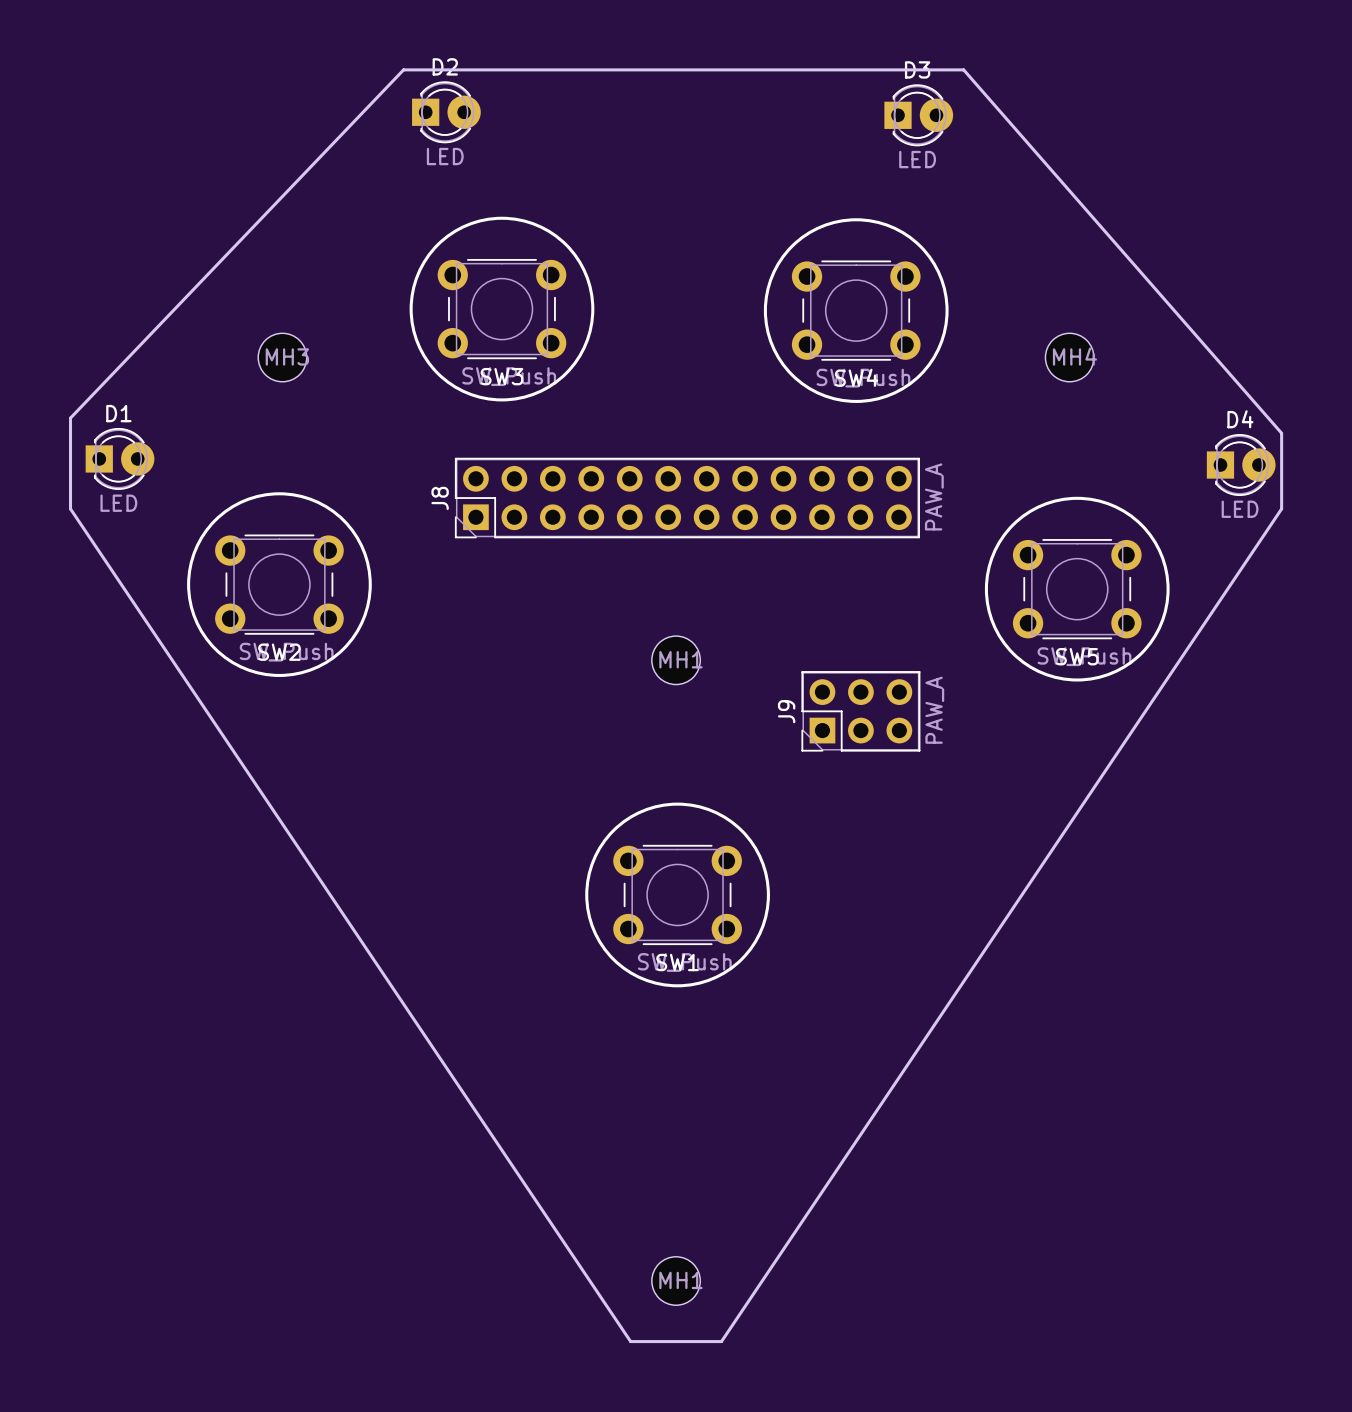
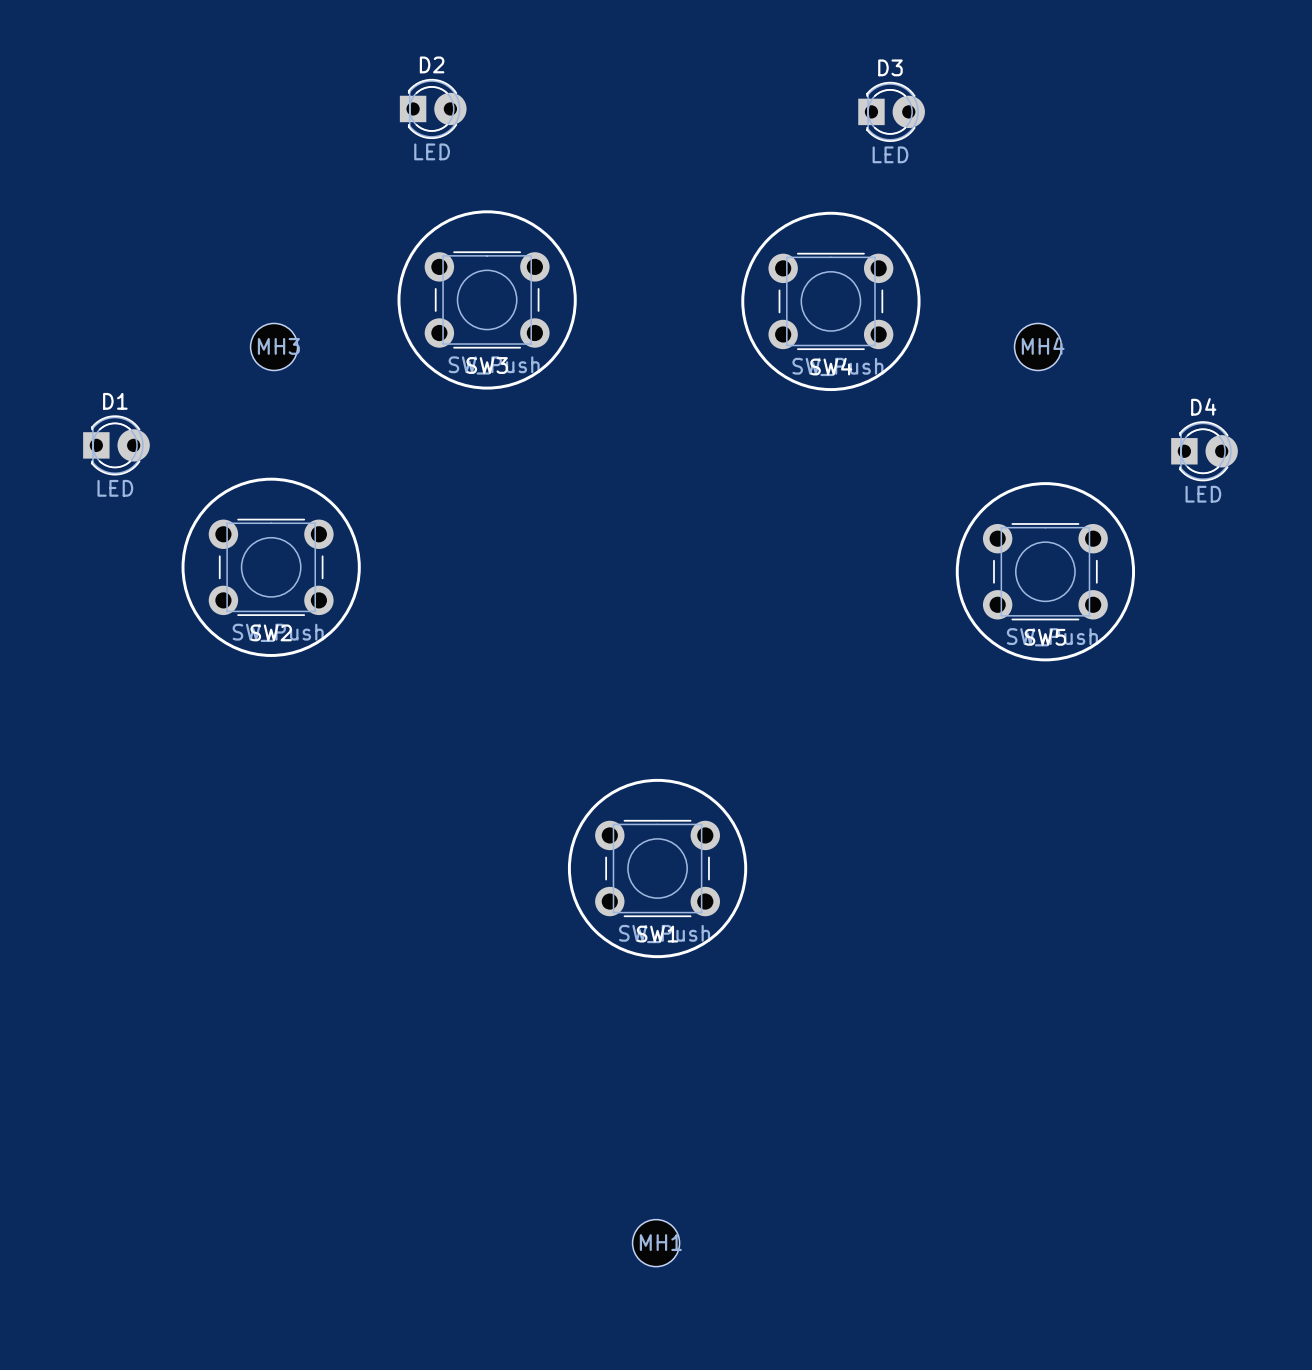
board edge: (403, 69) (70, 418) (70, 508) (630, 1341) (721, 1341) (1281, 508) (1281, 433) (963, 69) (403, 69) -> none
J8: PAW_A (687, 498) -> none
MH1: (676, 660) -> none
J9: PAW_A (860, 711) -> none

